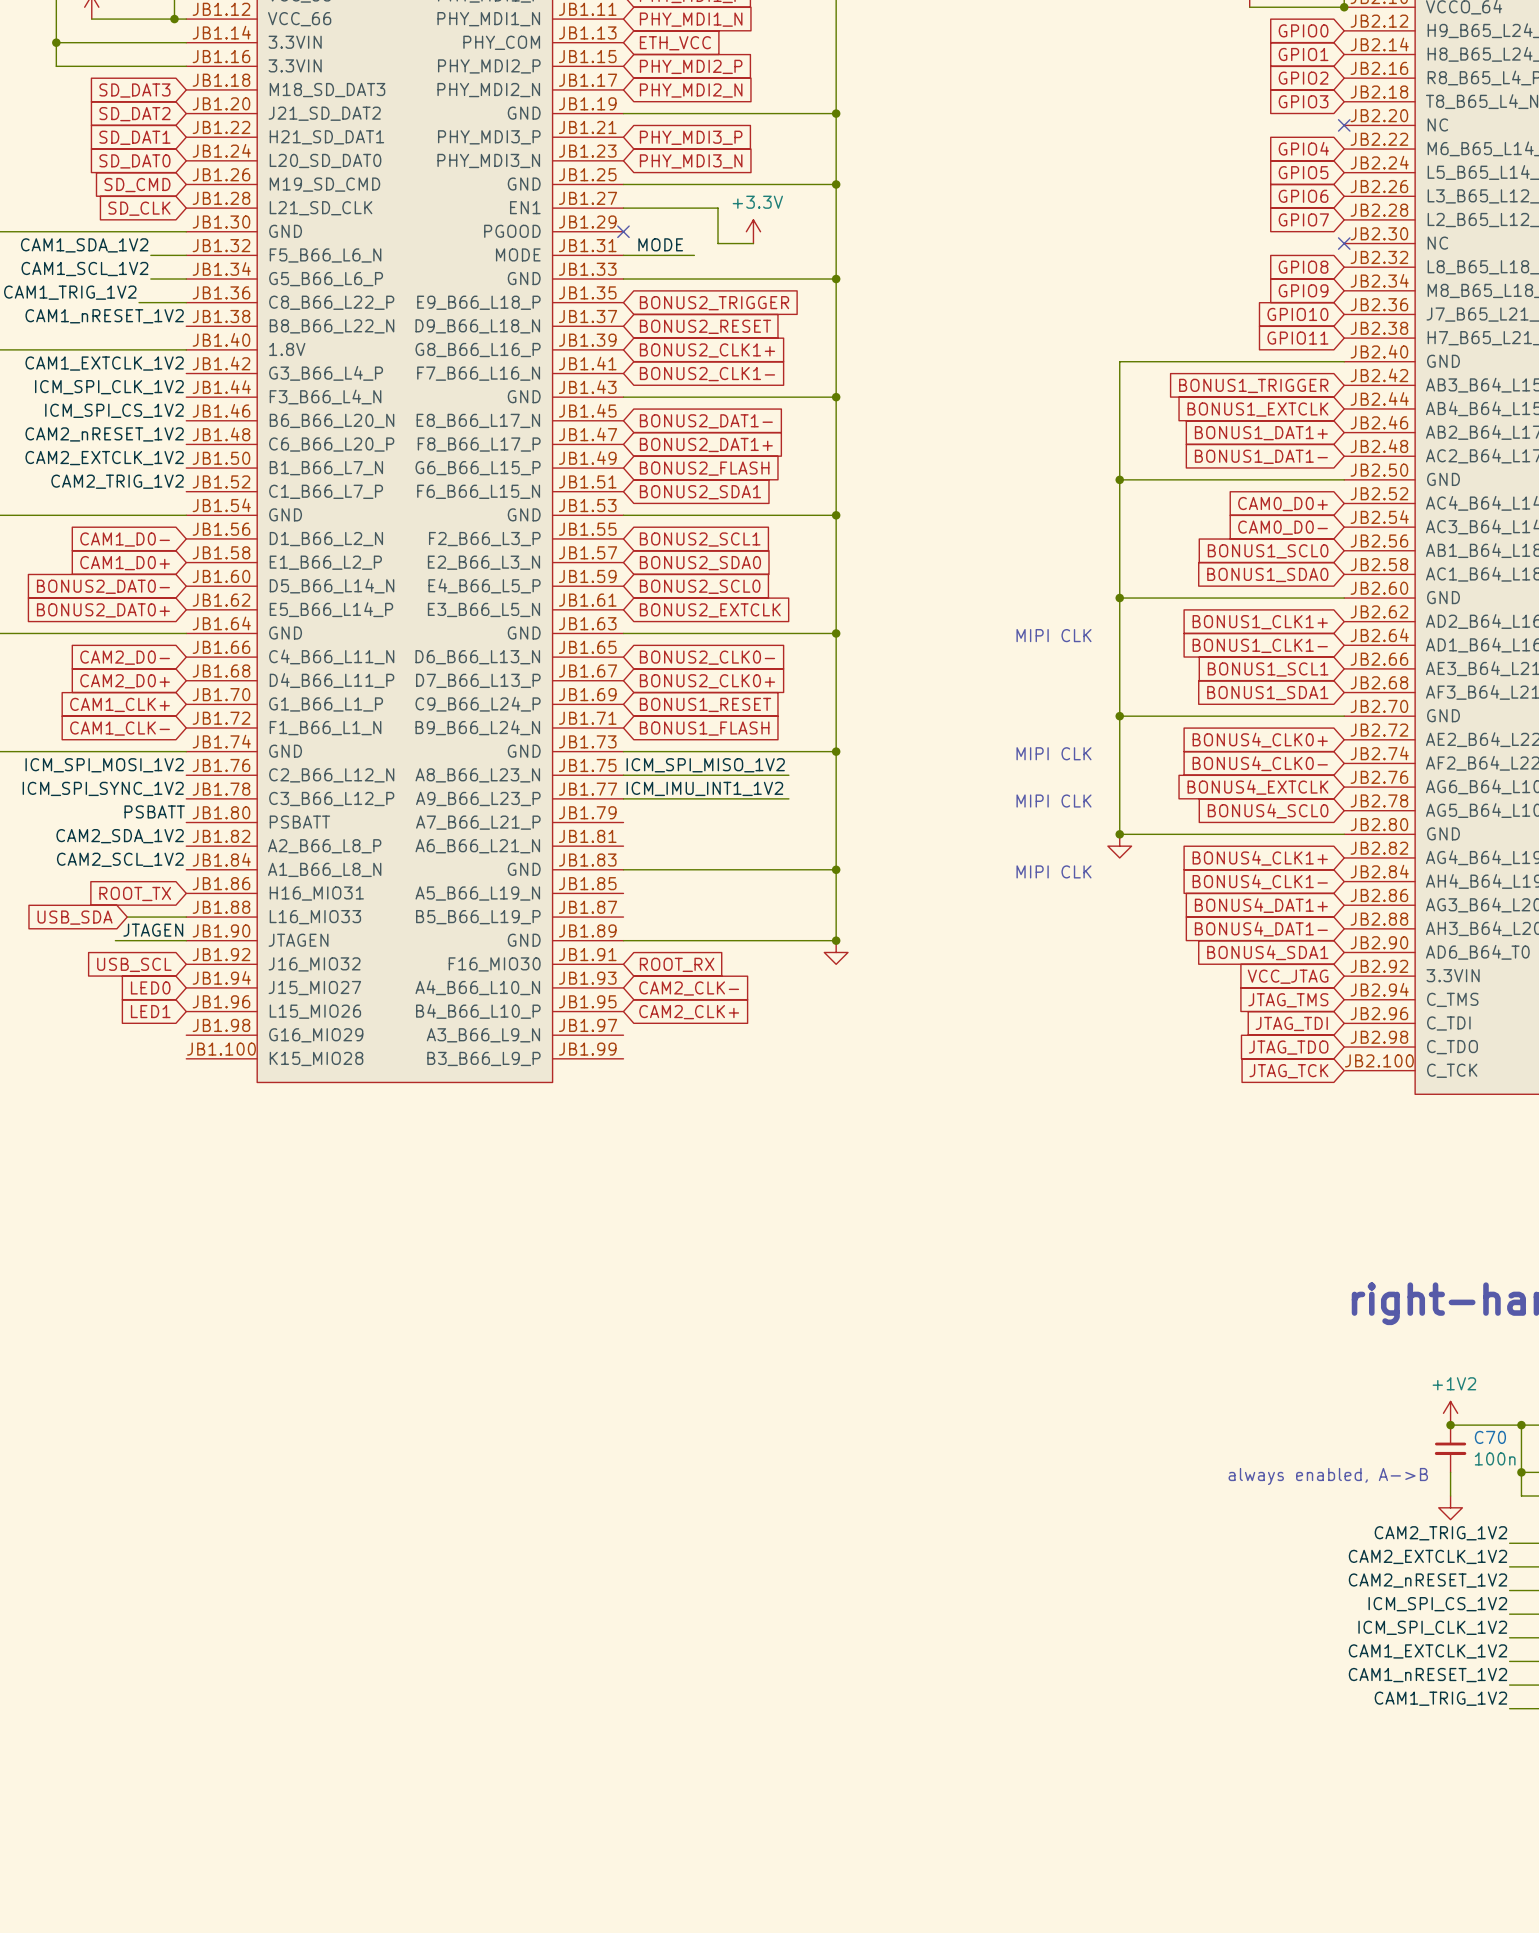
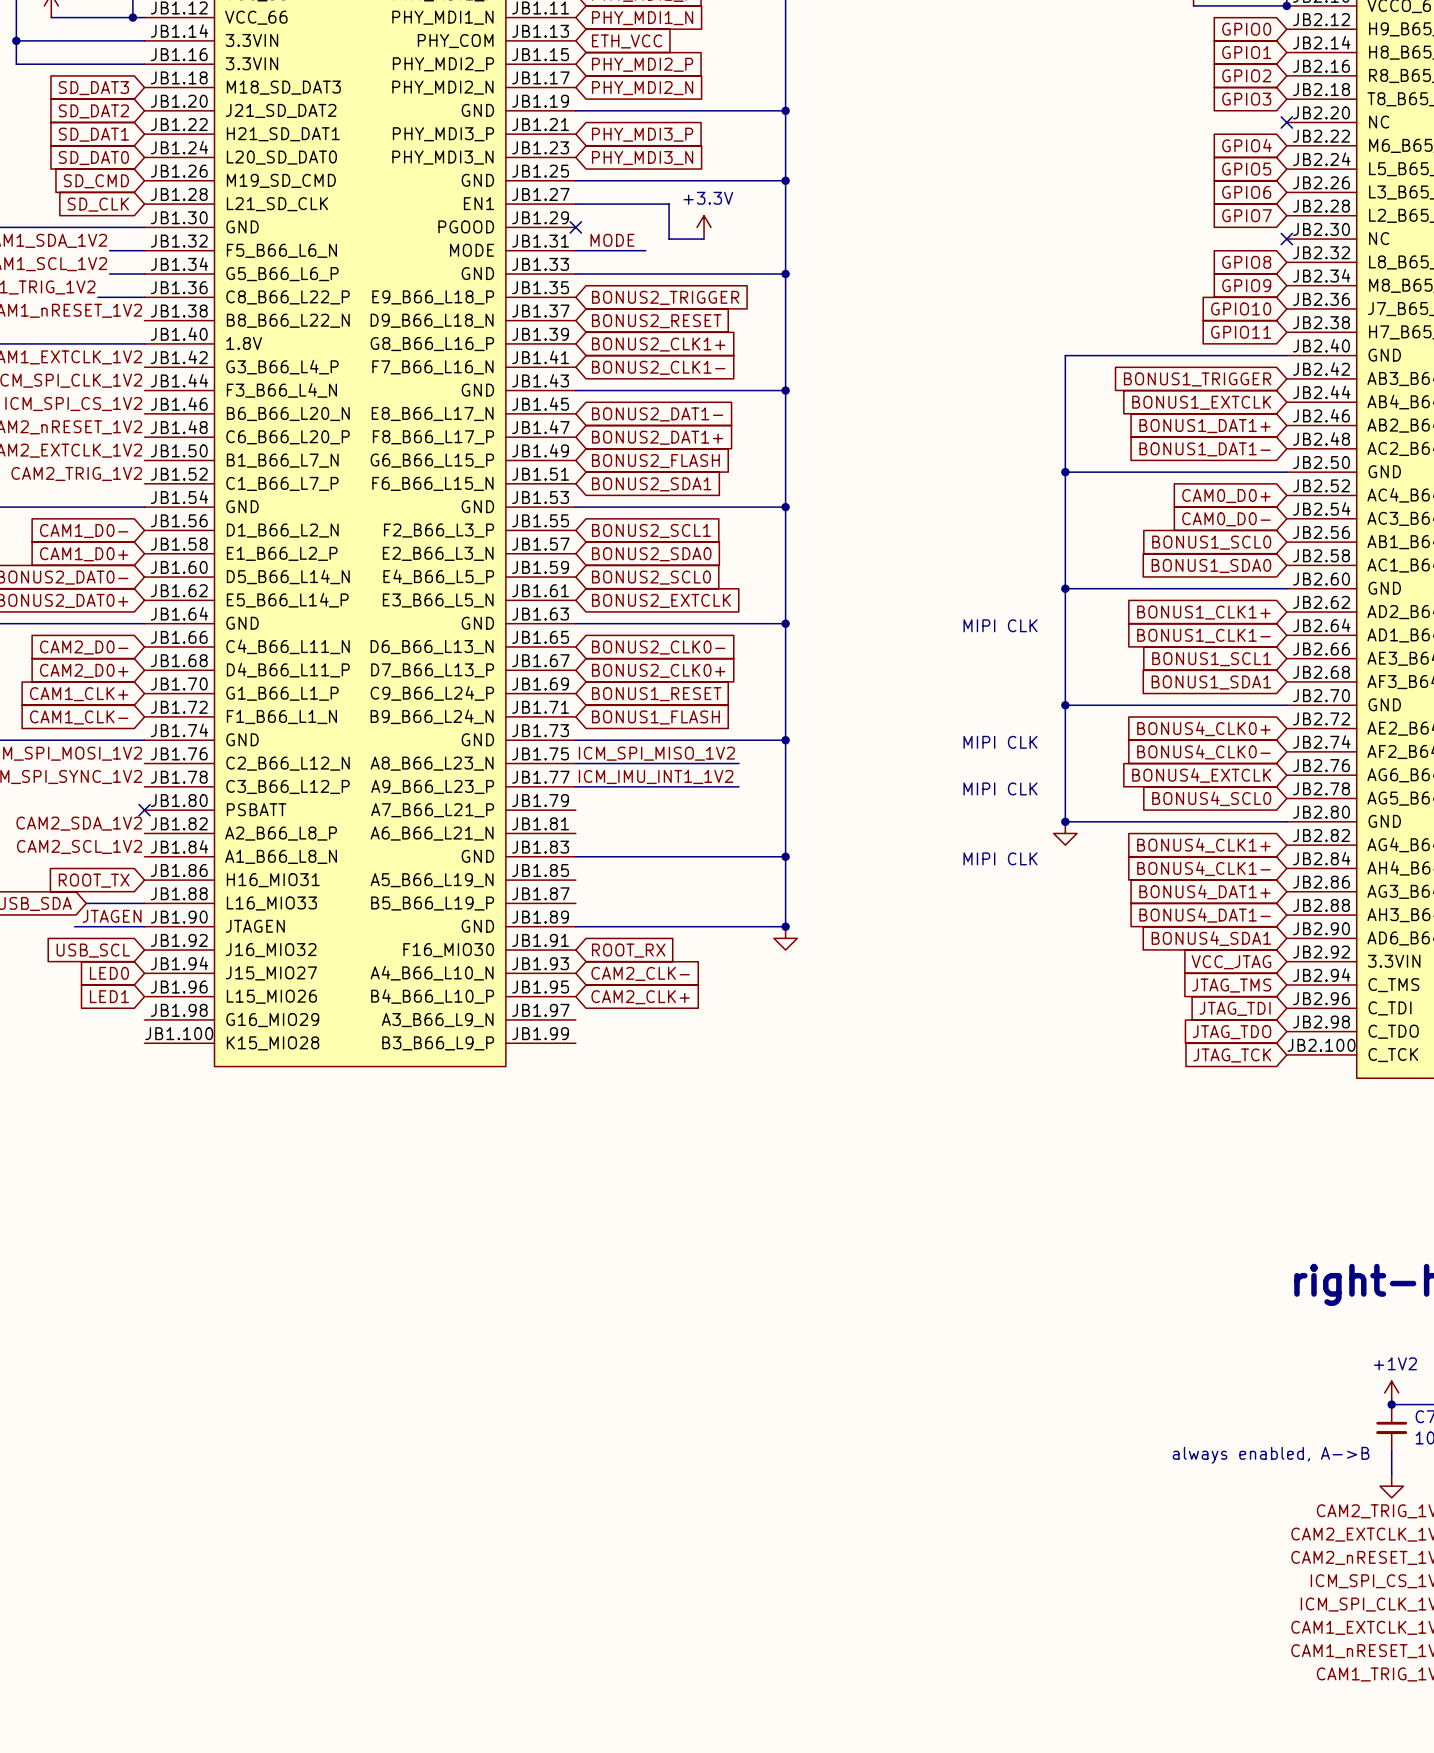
label: PSBATT (154, 811) -> none
no-connect mark: none -> (144, 810)

